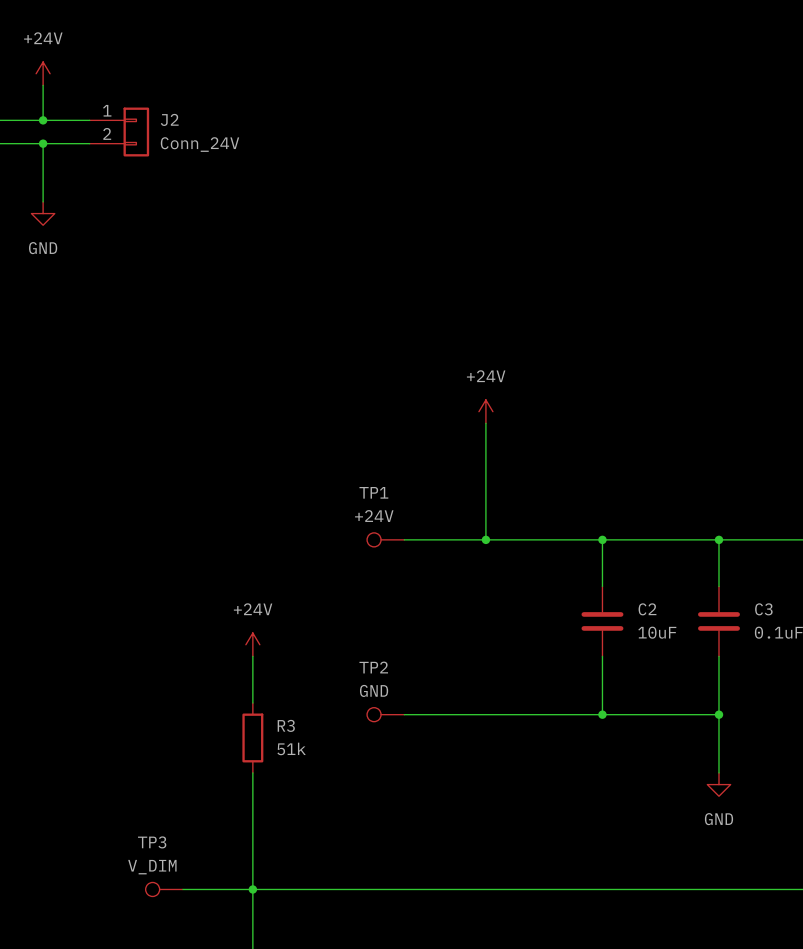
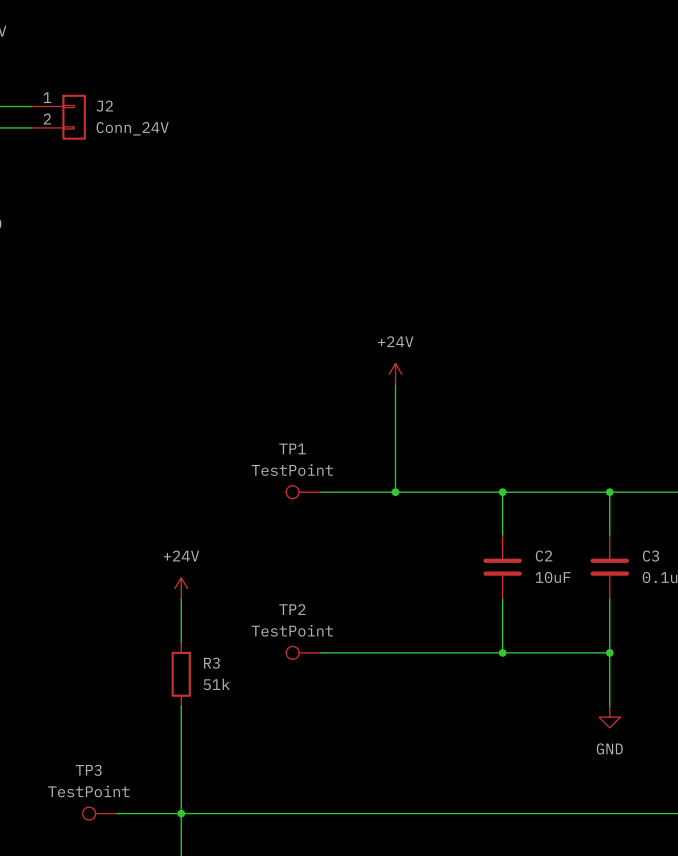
TP1 value: +24V (374, 516) -> TestPoint (292, 470)
TP2 value: GND (374, 690) -> TestPoint (292, 630)
TP3 value: V_DIM (152, 867) -> TestPoint (88, 791)

